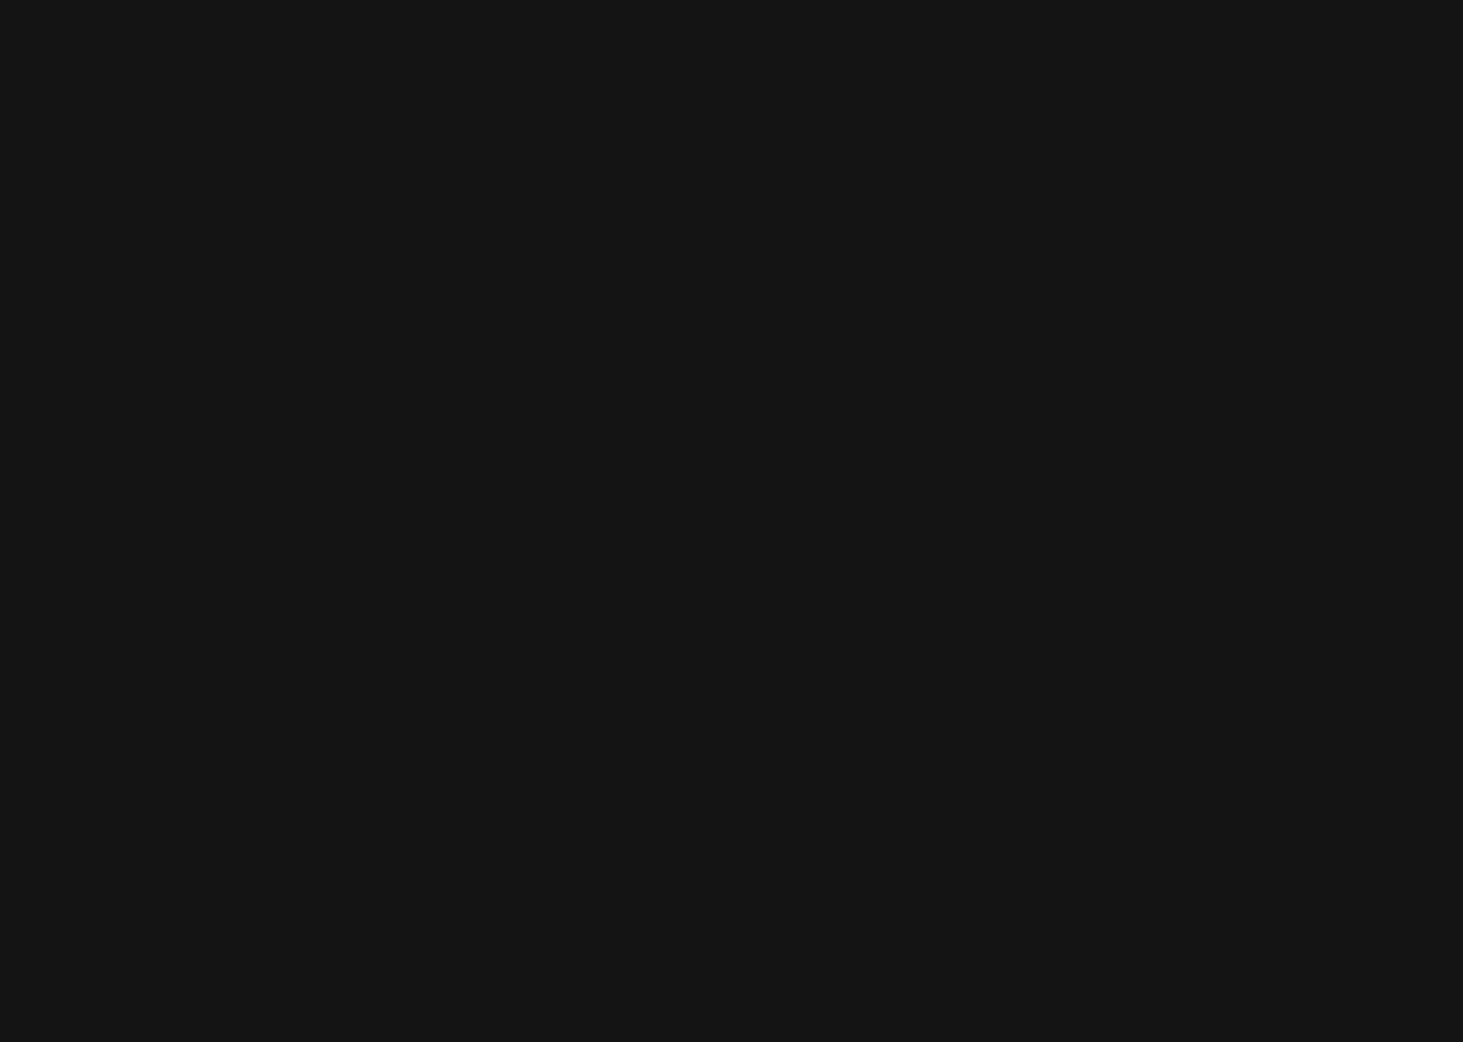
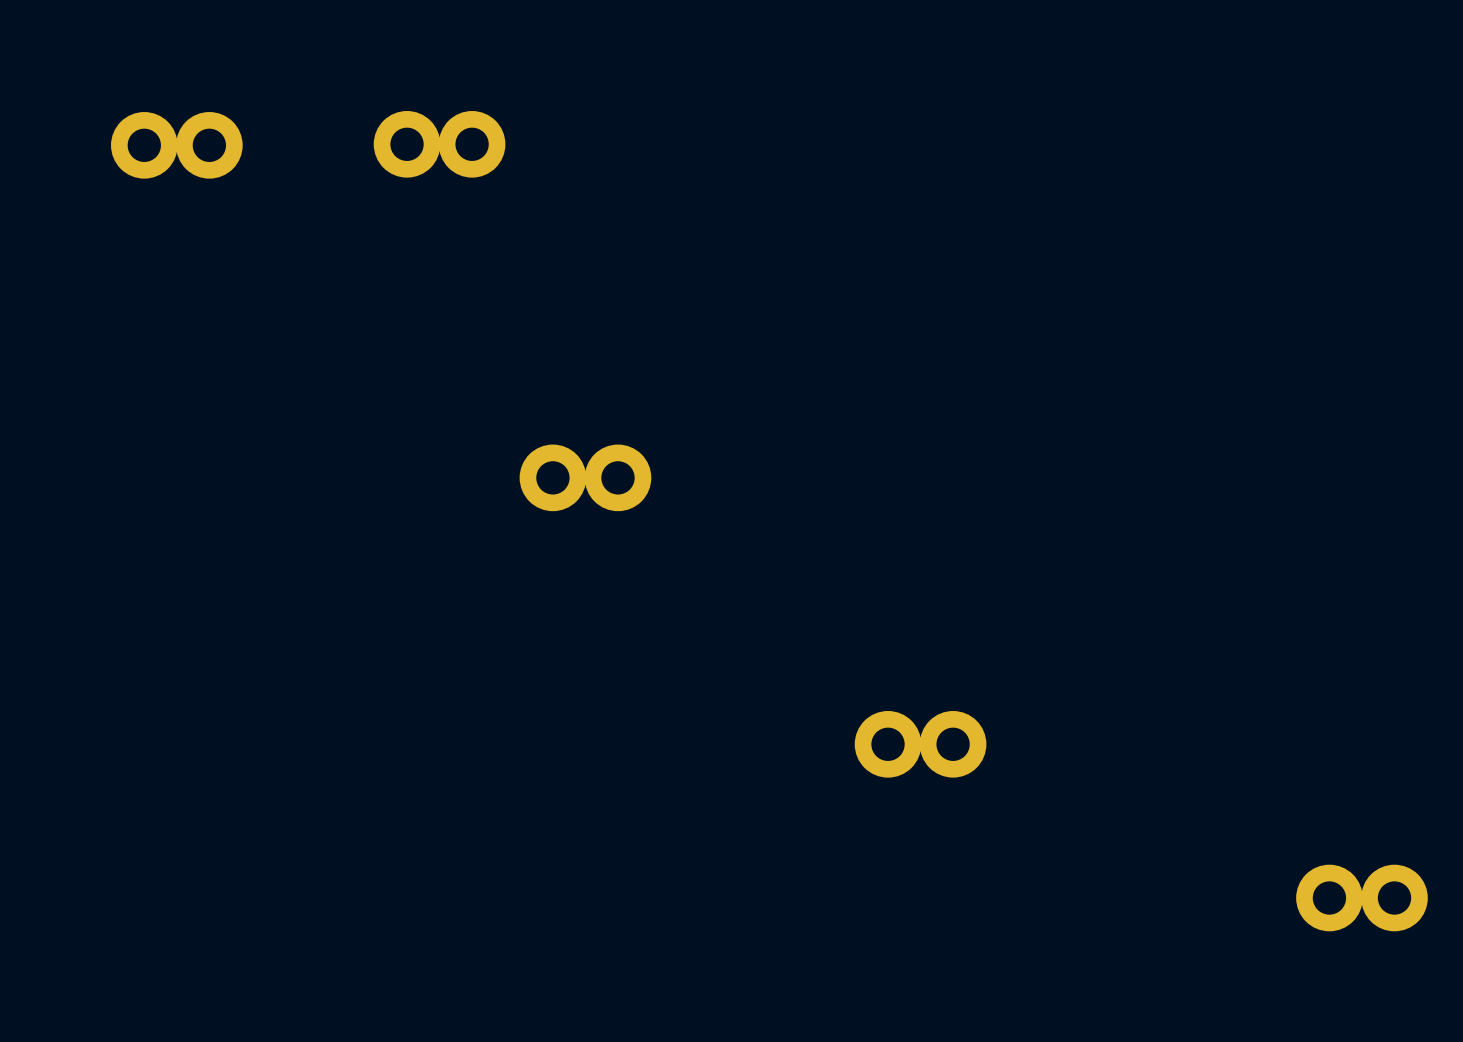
part: none -> (439, 144)
part: none -> (176, 145)
part: none -> (585, 477)
part: none -> (920, 744)
part: none -> (1361, 898)

